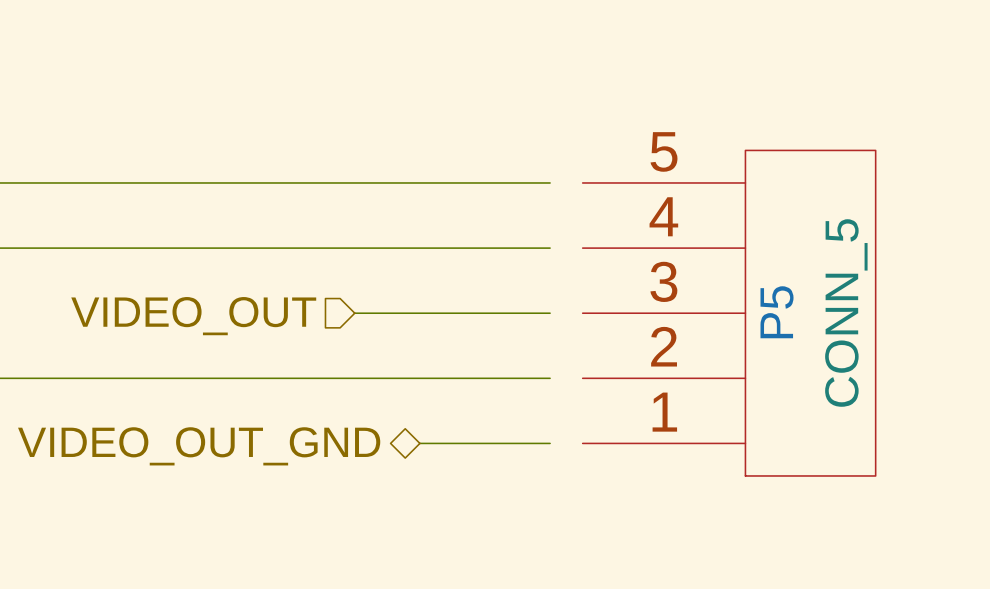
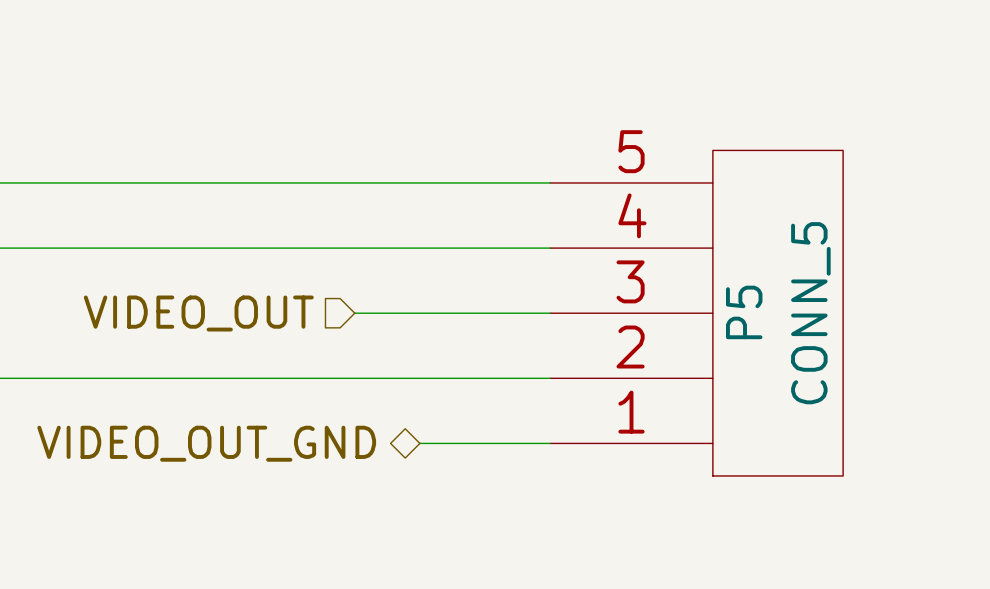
P5 position: (729, 313) -> (696, 313)

